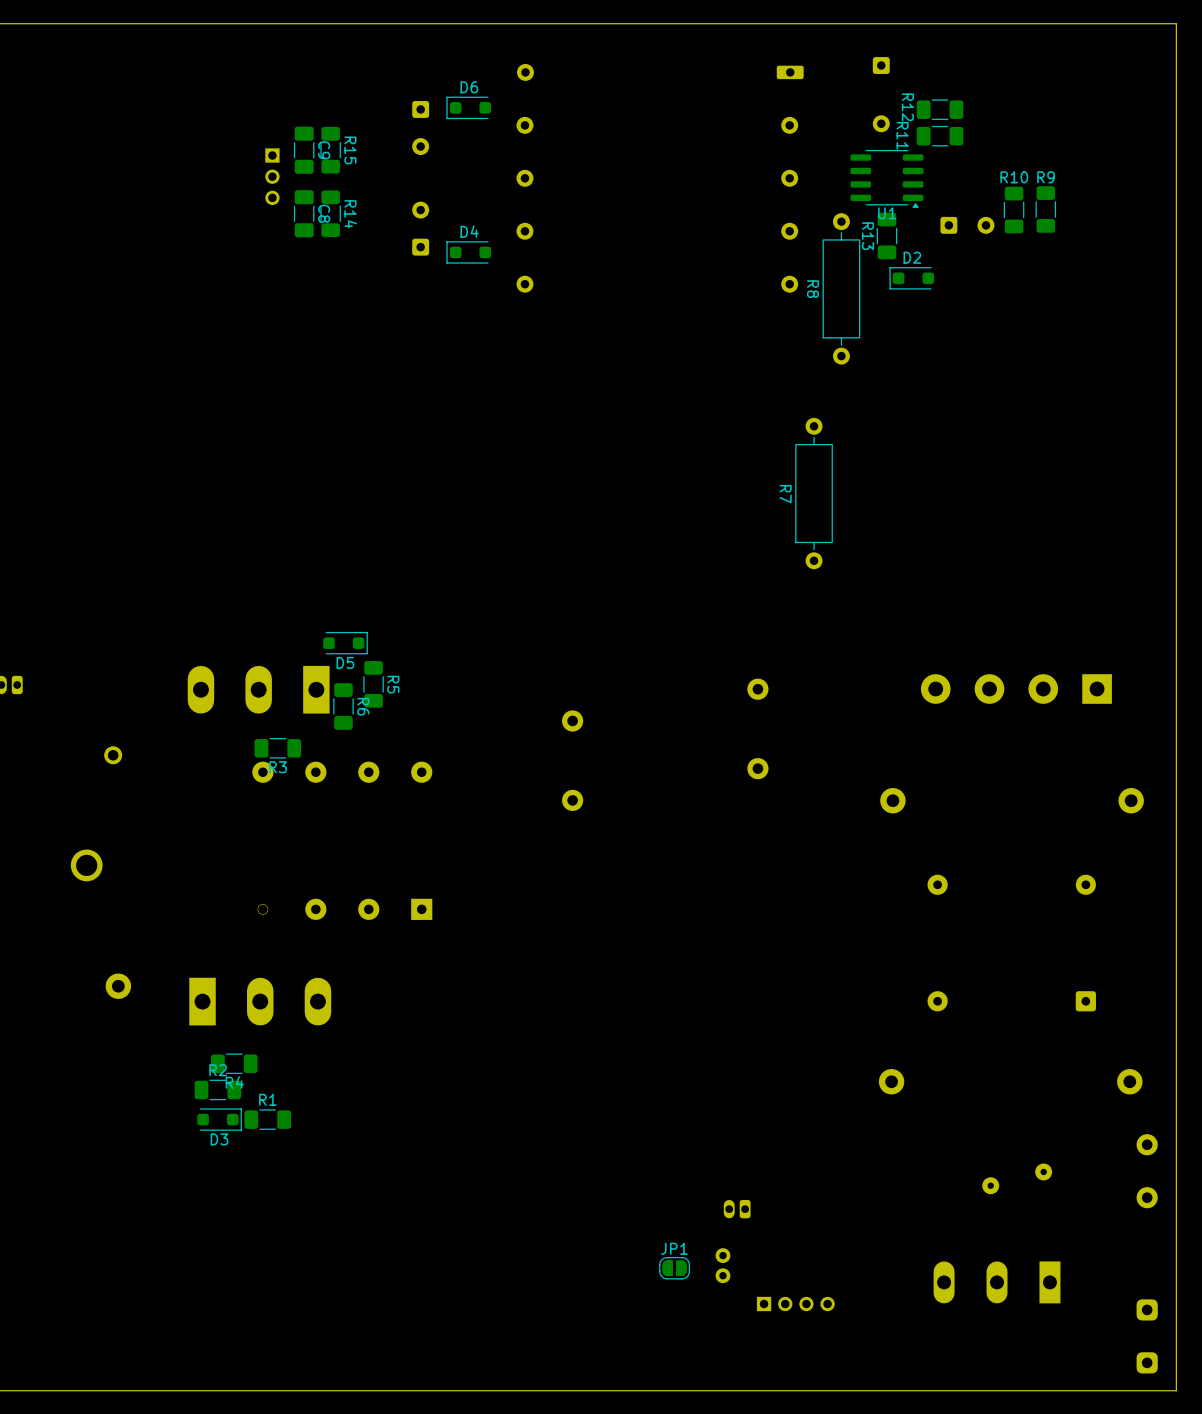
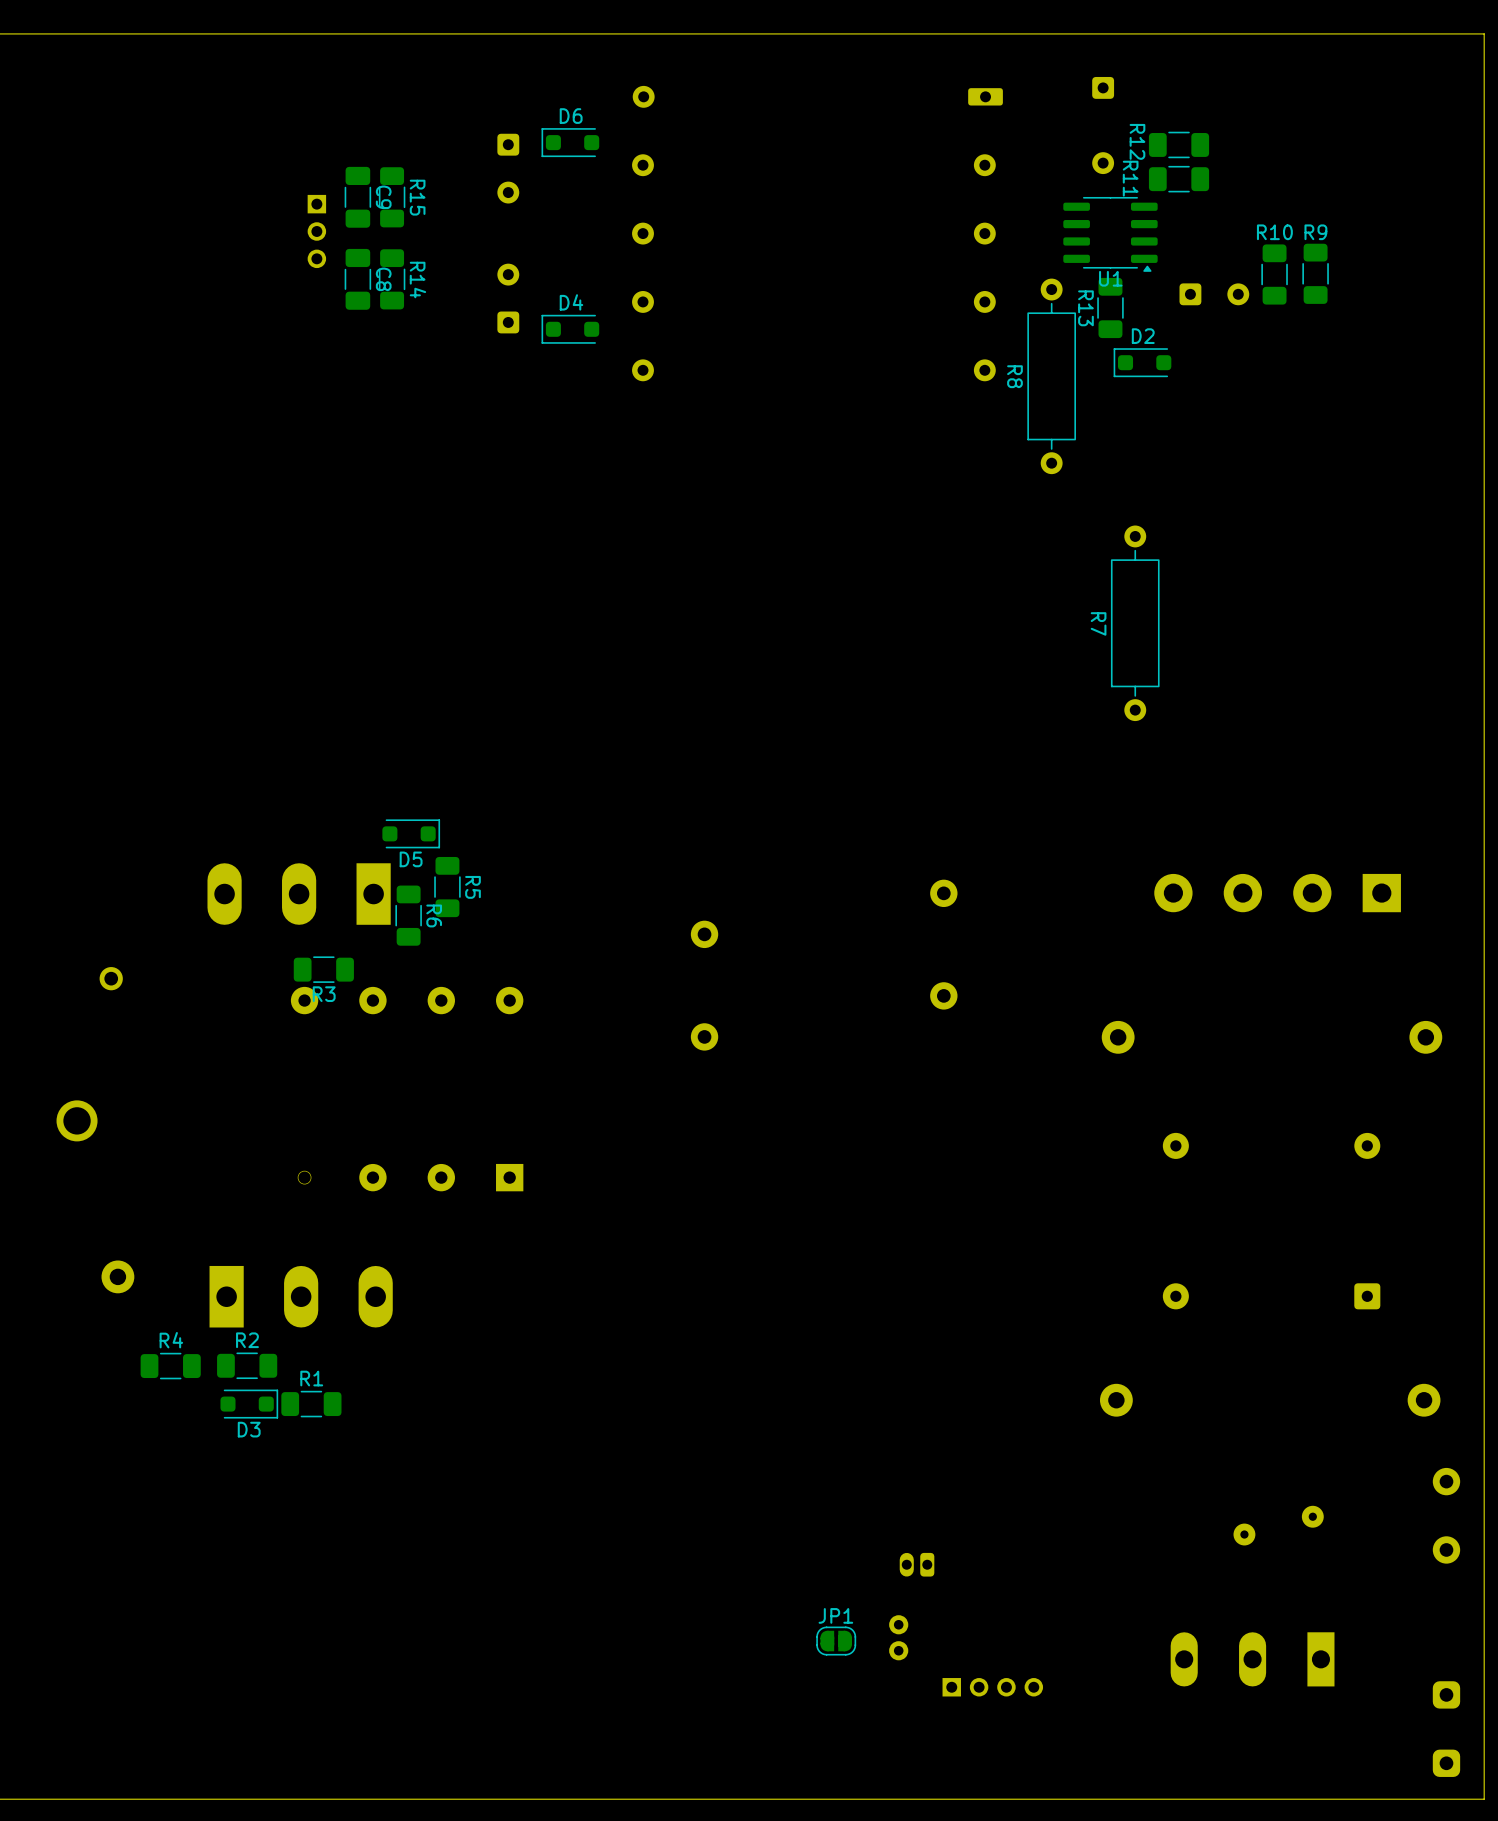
R7 position: (814, 493) -> (1135, 623)
R4 position: (234, 1063) -> (170, 1366)
R4 name position: R4 (234, 1082) -> R4 (171, 1340)
R2 position: (217, 1089) -> (247, 1365)
D3 position: (219, 1119) -> (249, 1404)
R1 position: (267, 1119) -> (311, 1404)

